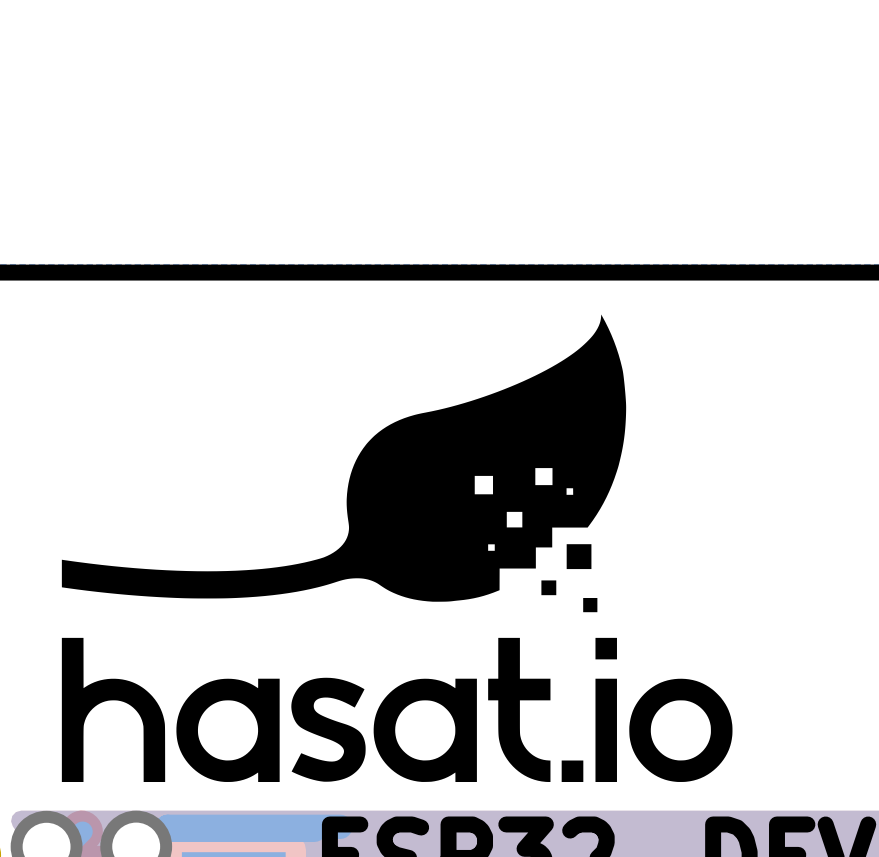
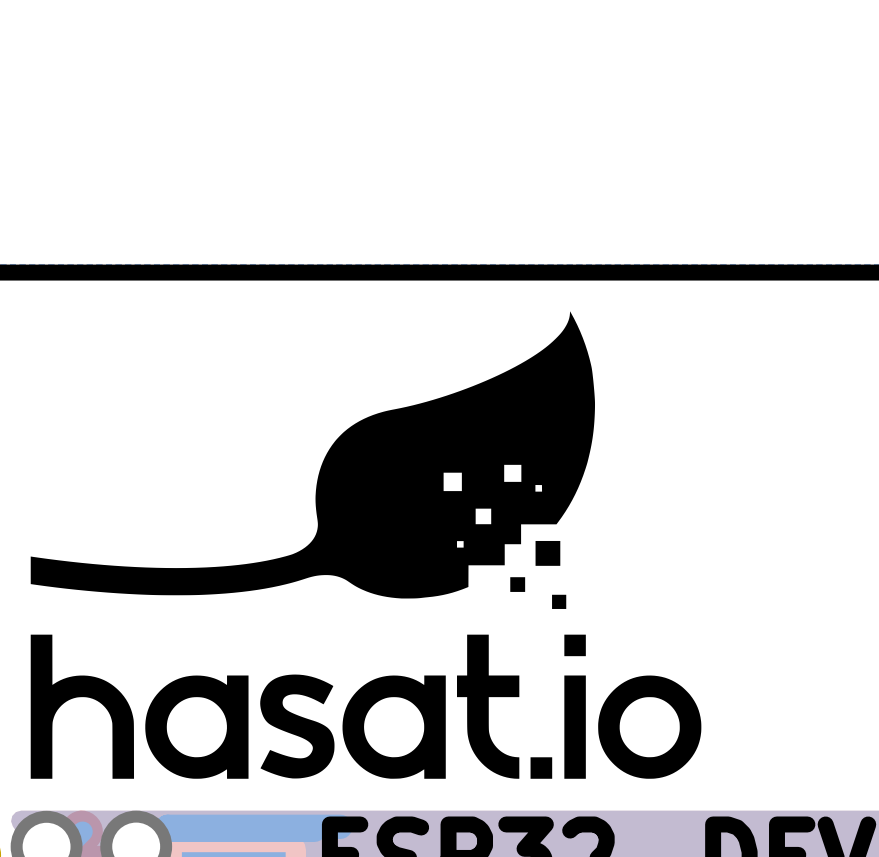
drawing position: (397, 548) -> (366, 545)

